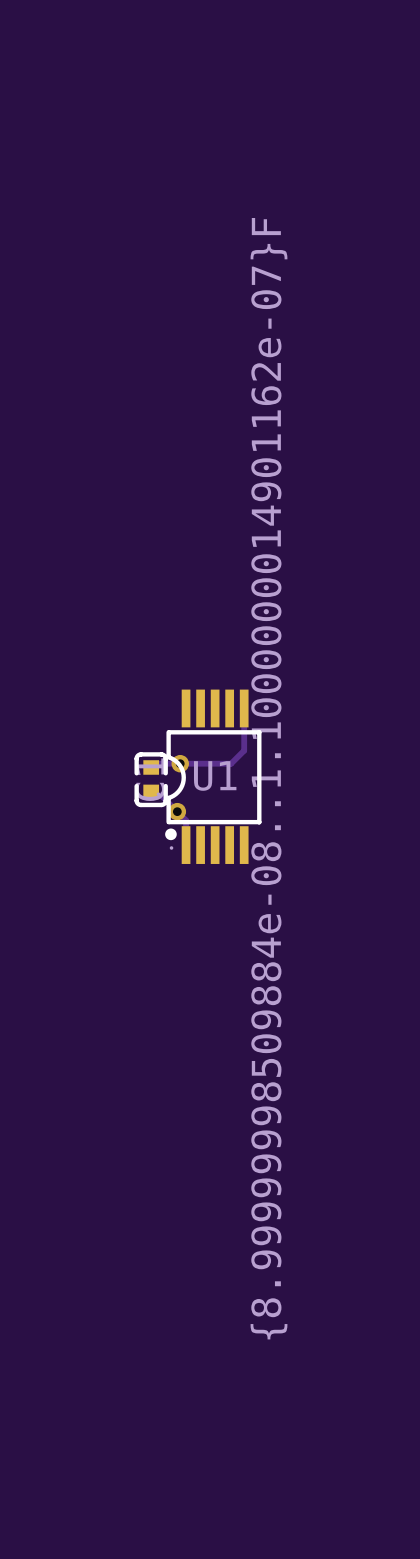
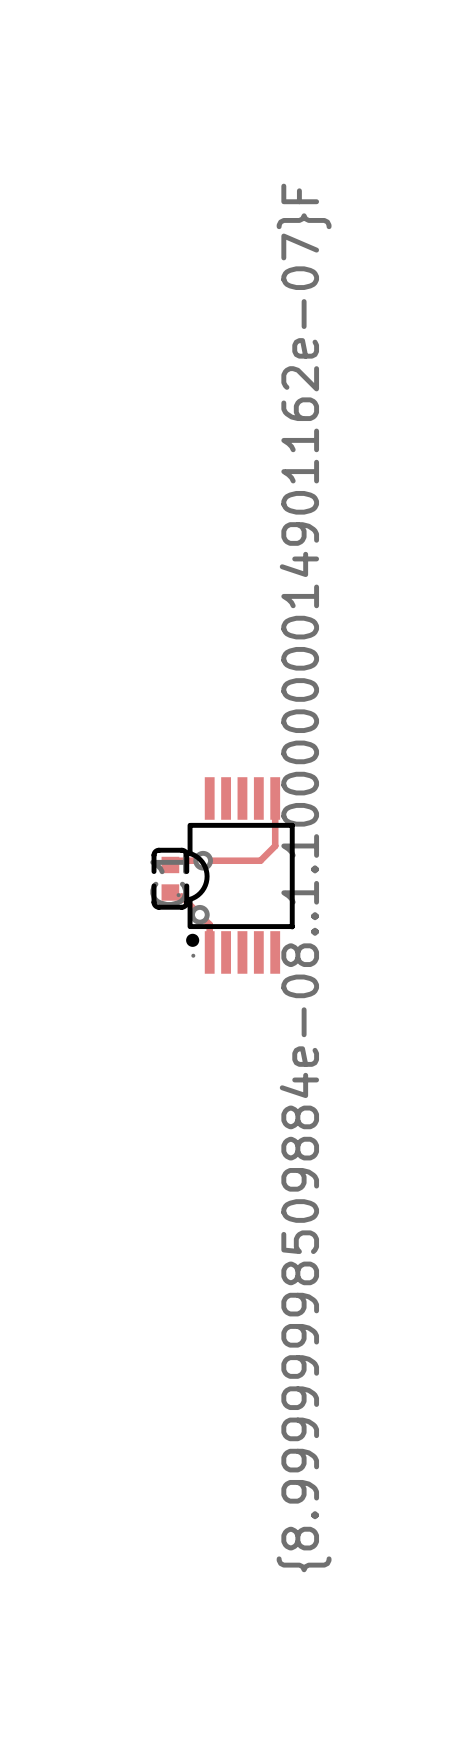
U1 name: U1 (215, 775) -> none

